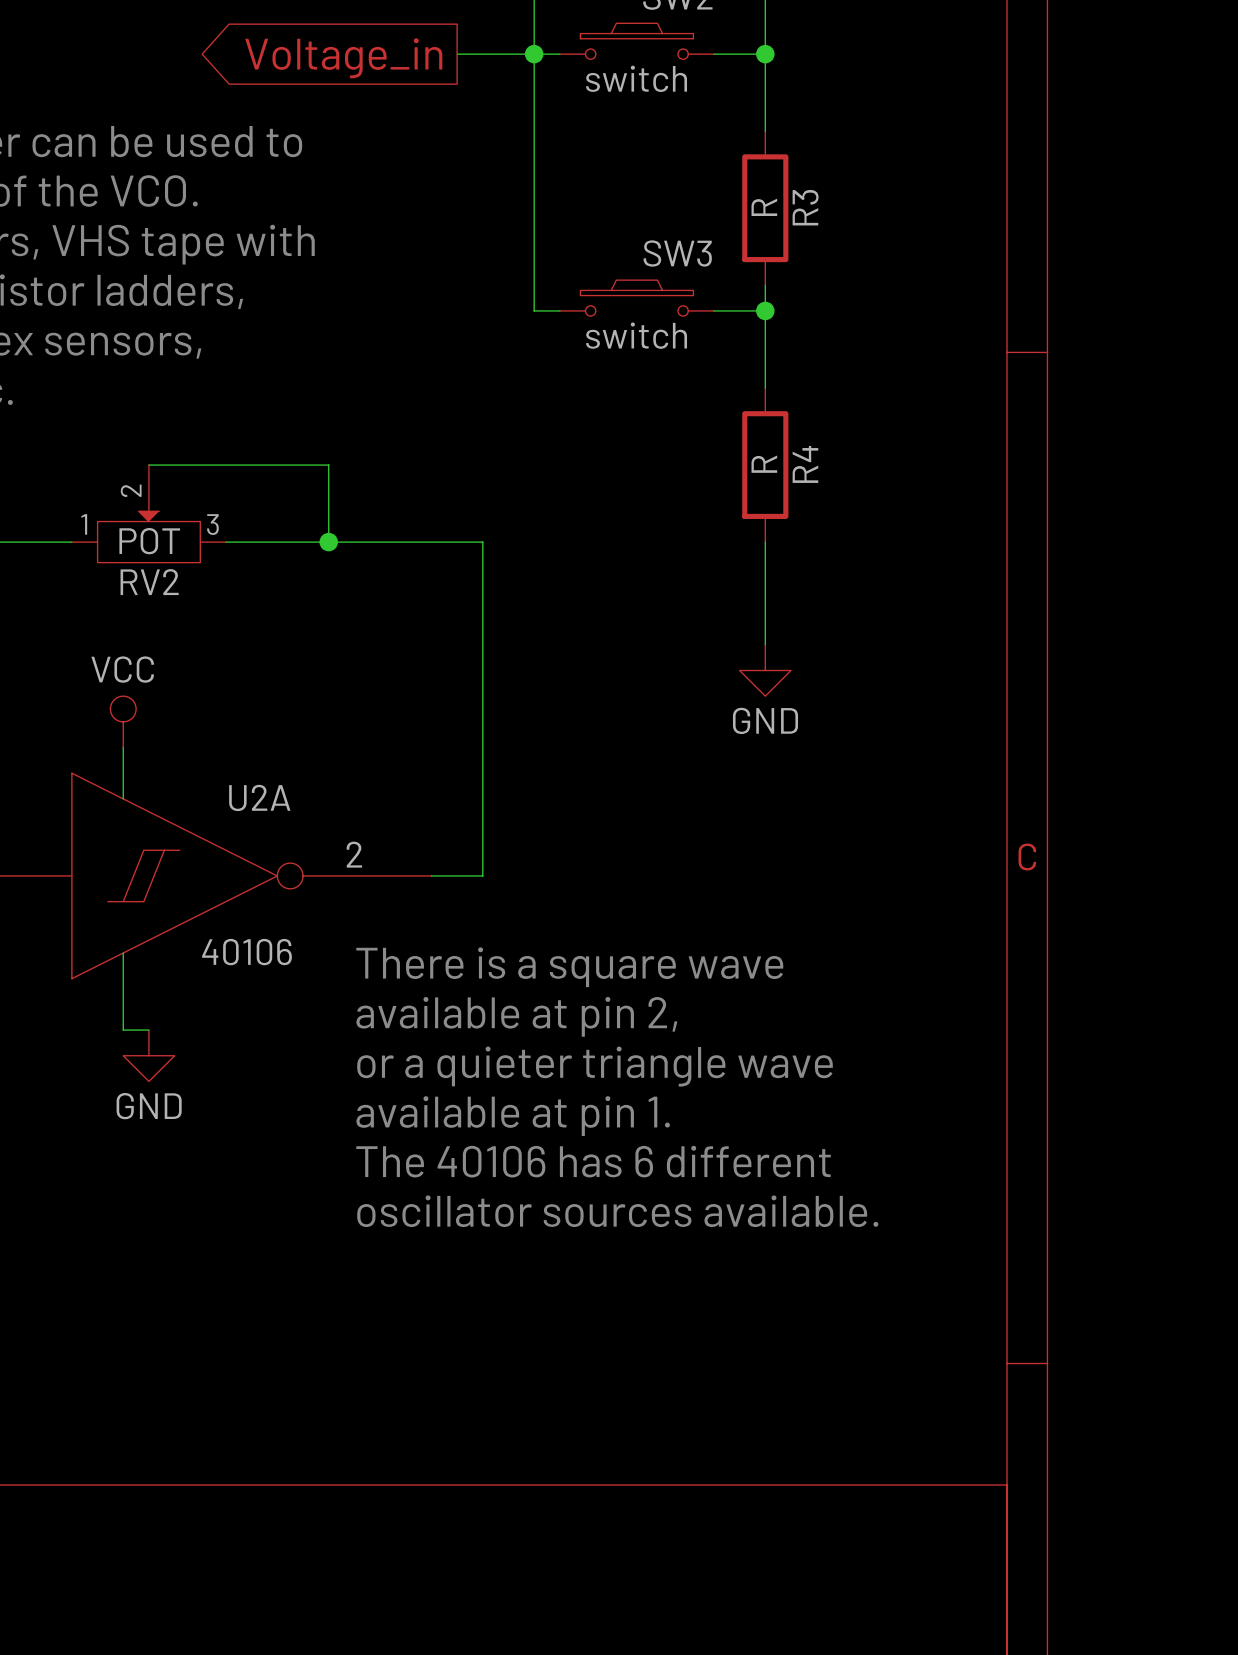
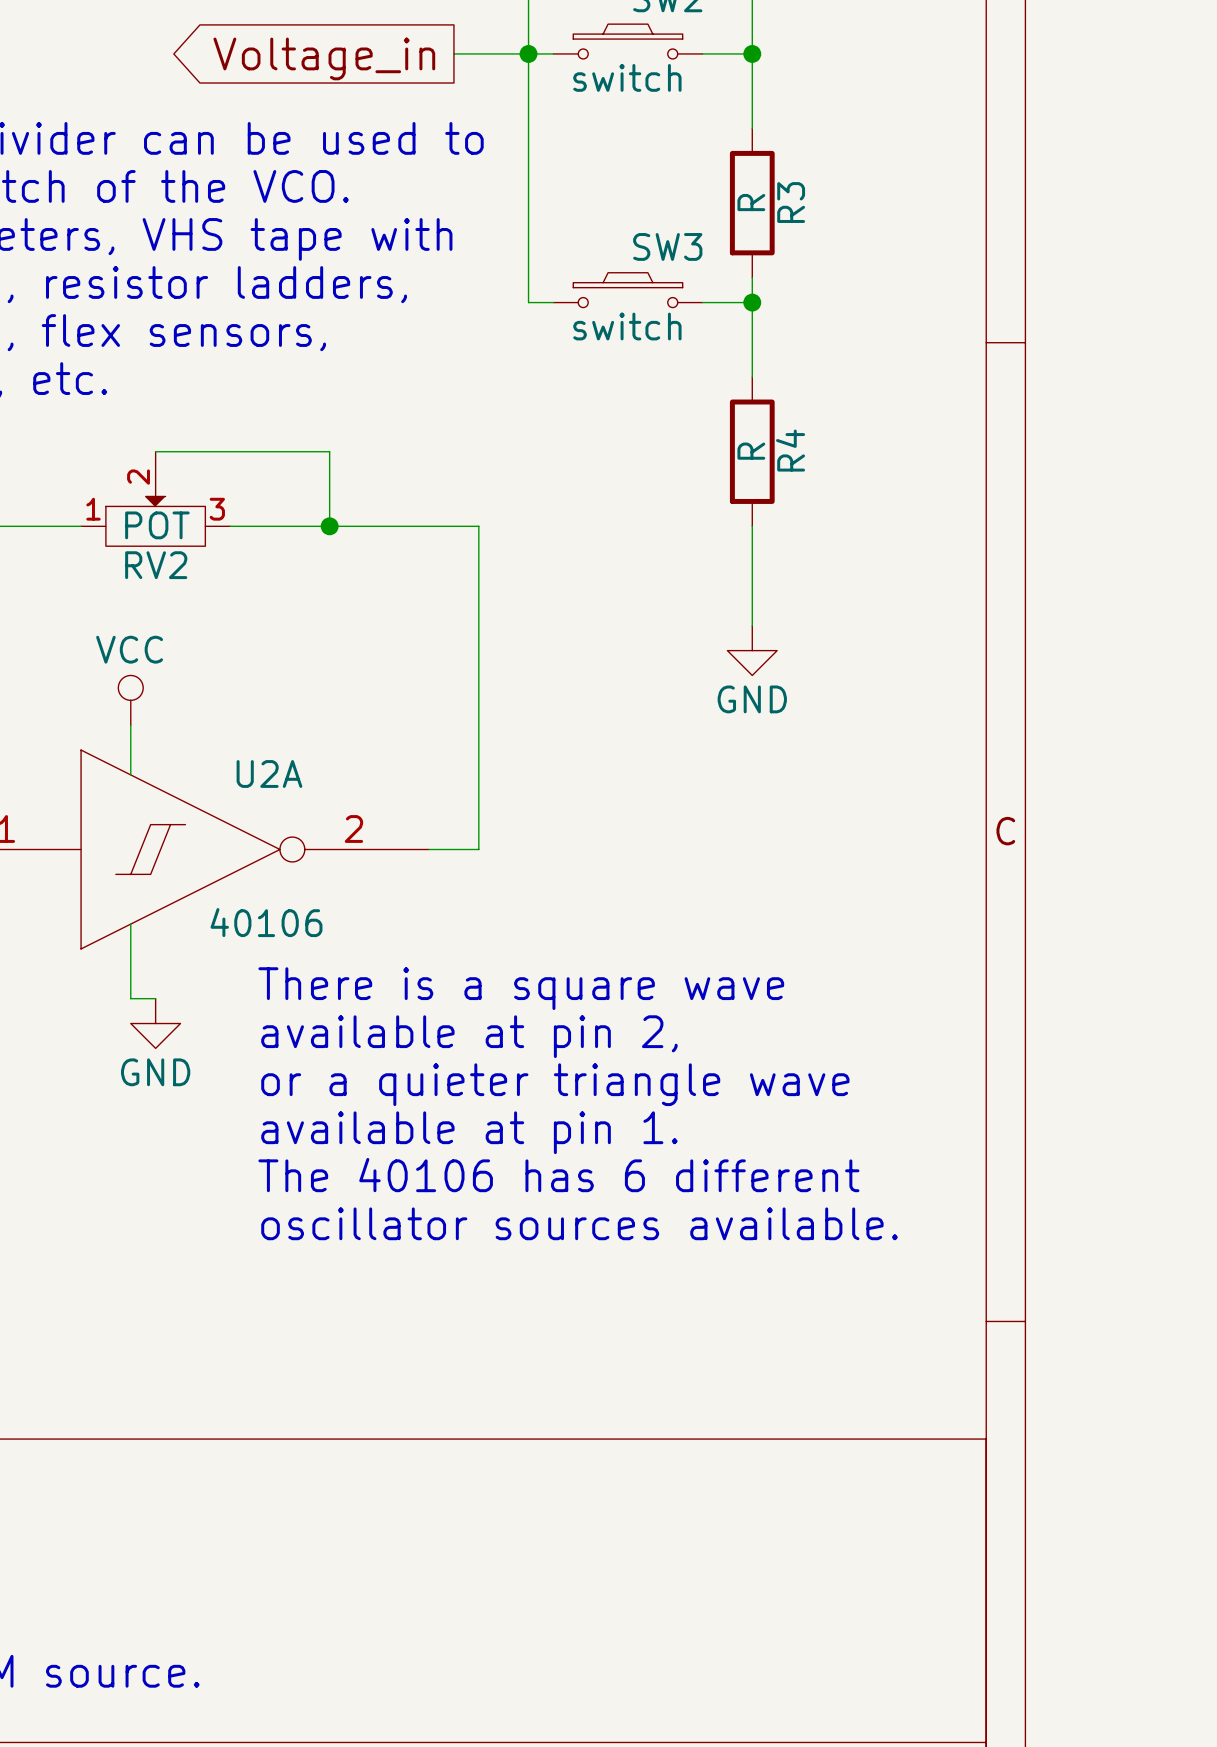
text position: There is a square wave (569, 967) -> There is a square wave (521, 988)
text position: available at pin 2, (516, 1016) -> available at pin 2, (469, 1036)
text position: or a quieter triangle wave (595, 1066) -> or a quieter triangle wave (555, 1084)
text position: available at pin 1. (513, 1116) -> available at pin 1. (469, 1132)
text position: The 40106 has 6 different (593, 1161) -> The 40106 has 6 different (558, 1175)
text position: oscillator sources available. (617, 1211) -> oscillator sources available. (579, 1223)

